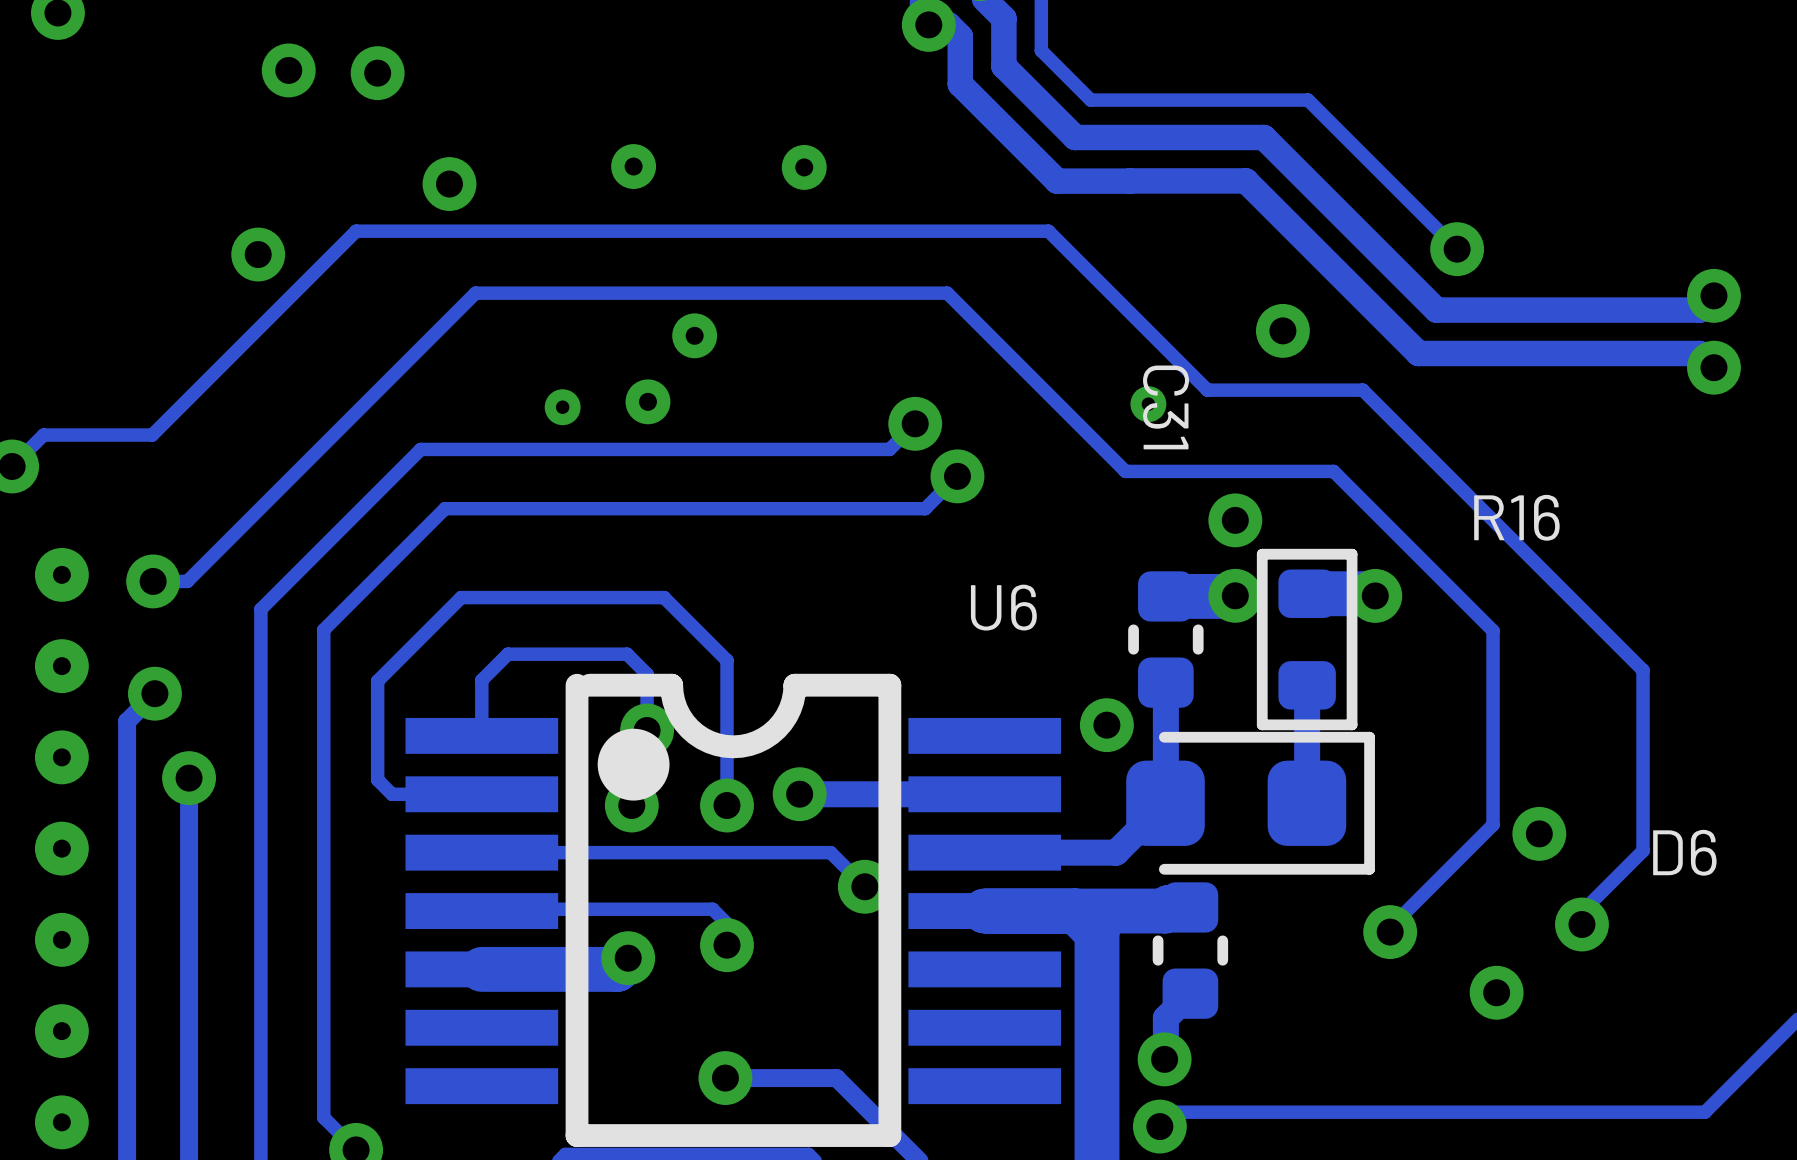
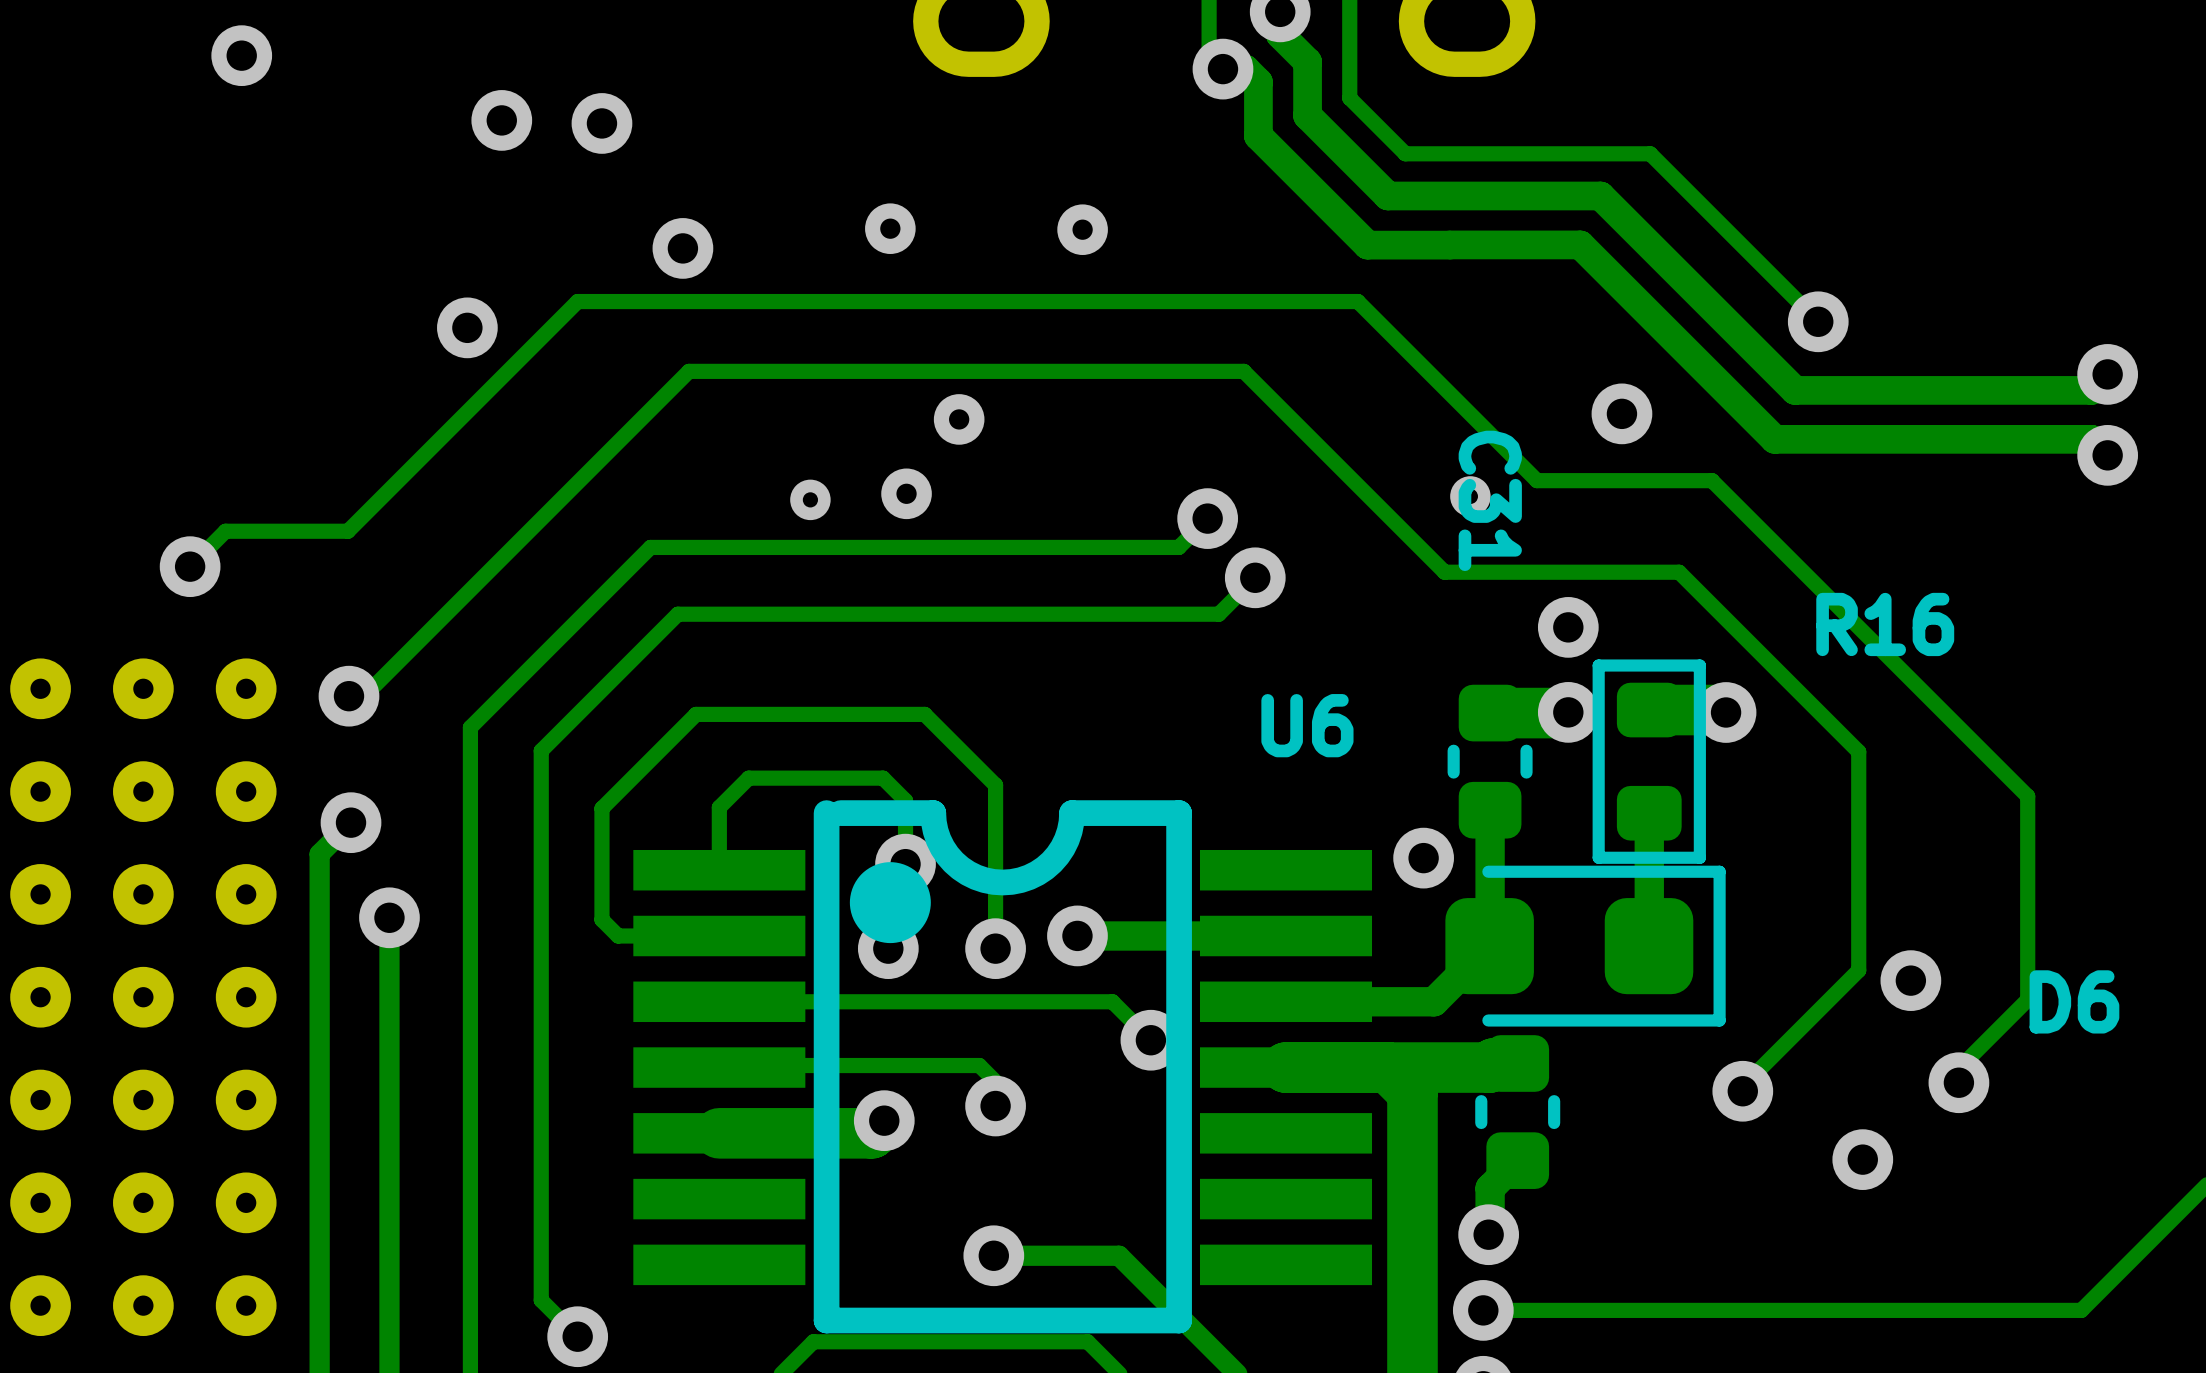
track: (475, 293) (187, 581) (166, 581) -> (712, 371) (688, 371) (364, 696)
track: (1705, 1112) (1174, 1112) (1159, 1126) -> (2097, 1294) (2081, 1310) (1483, 1310)

